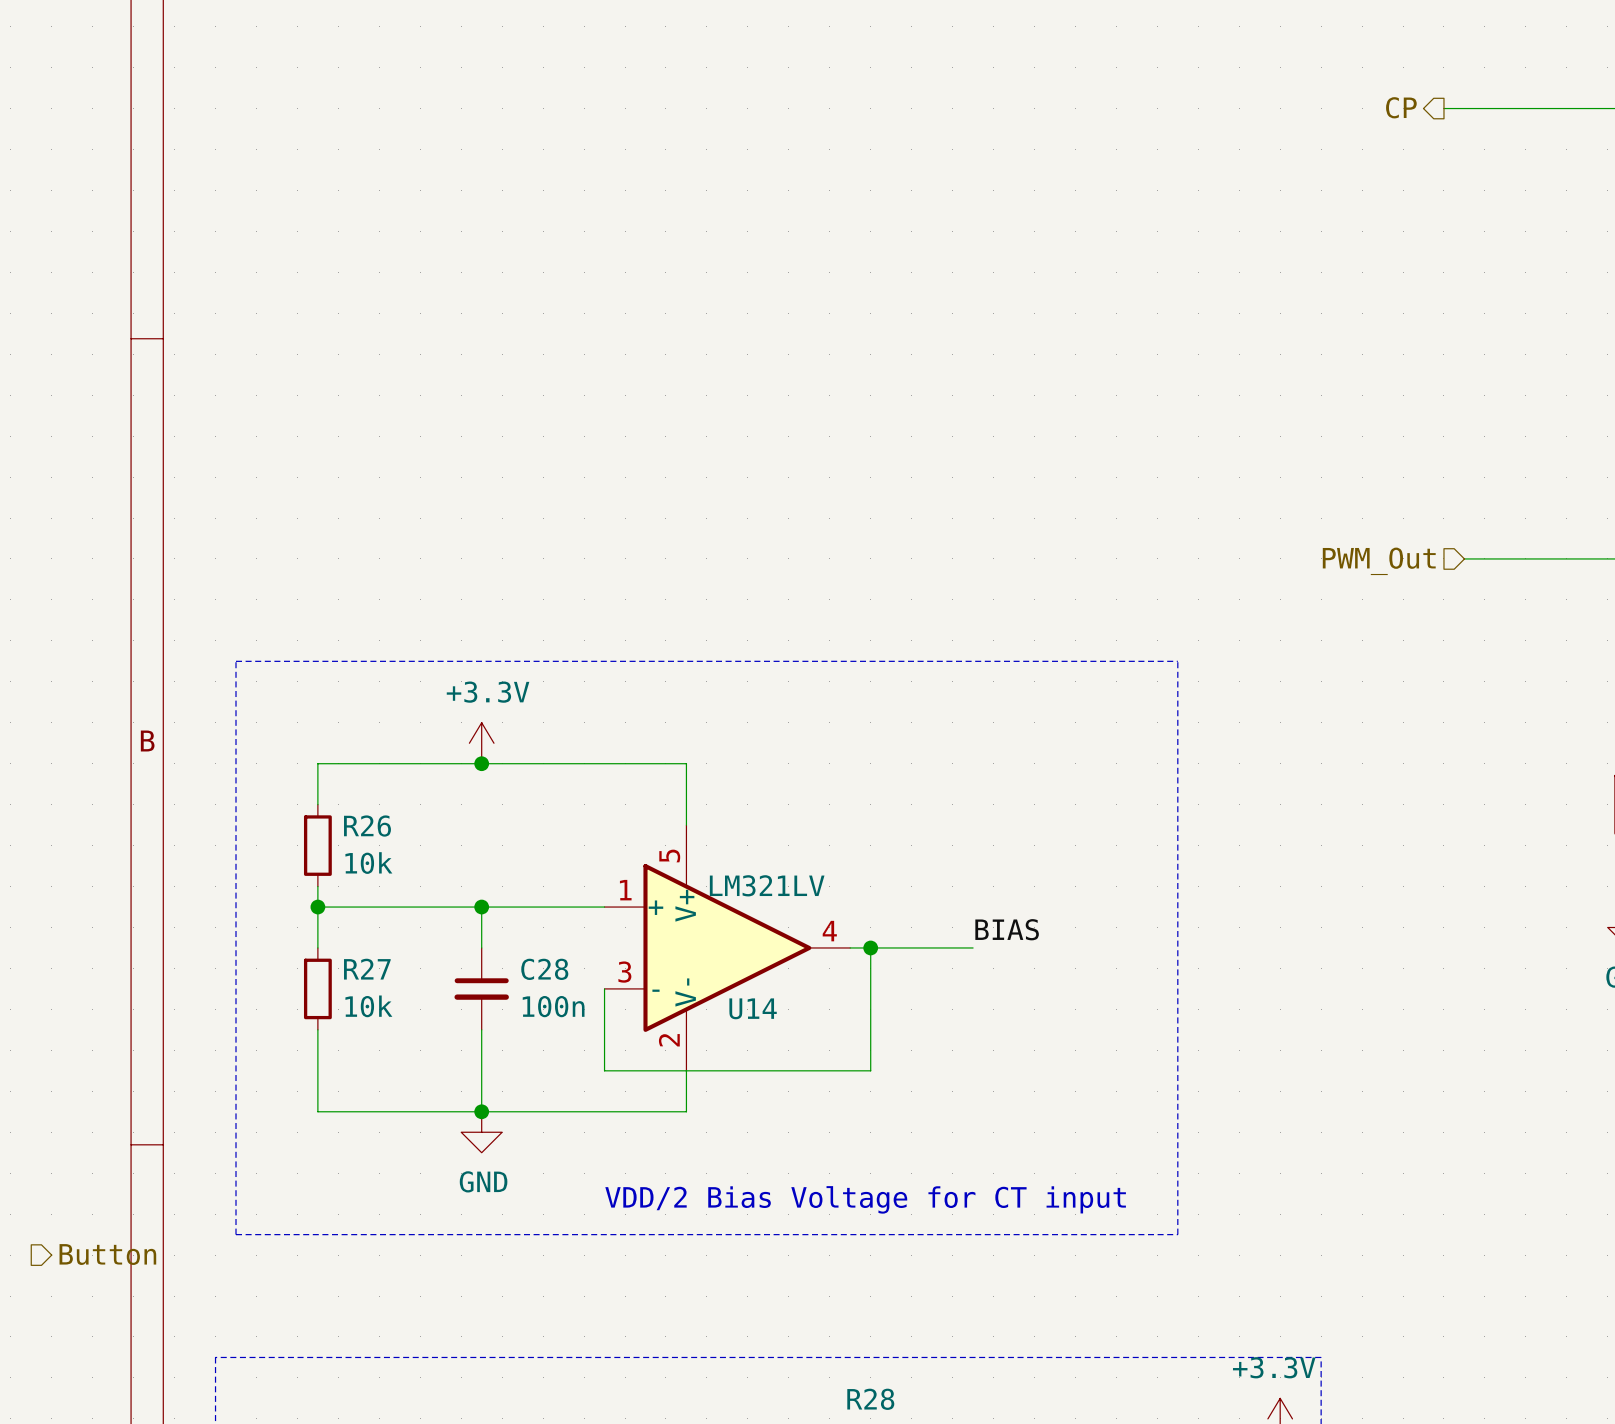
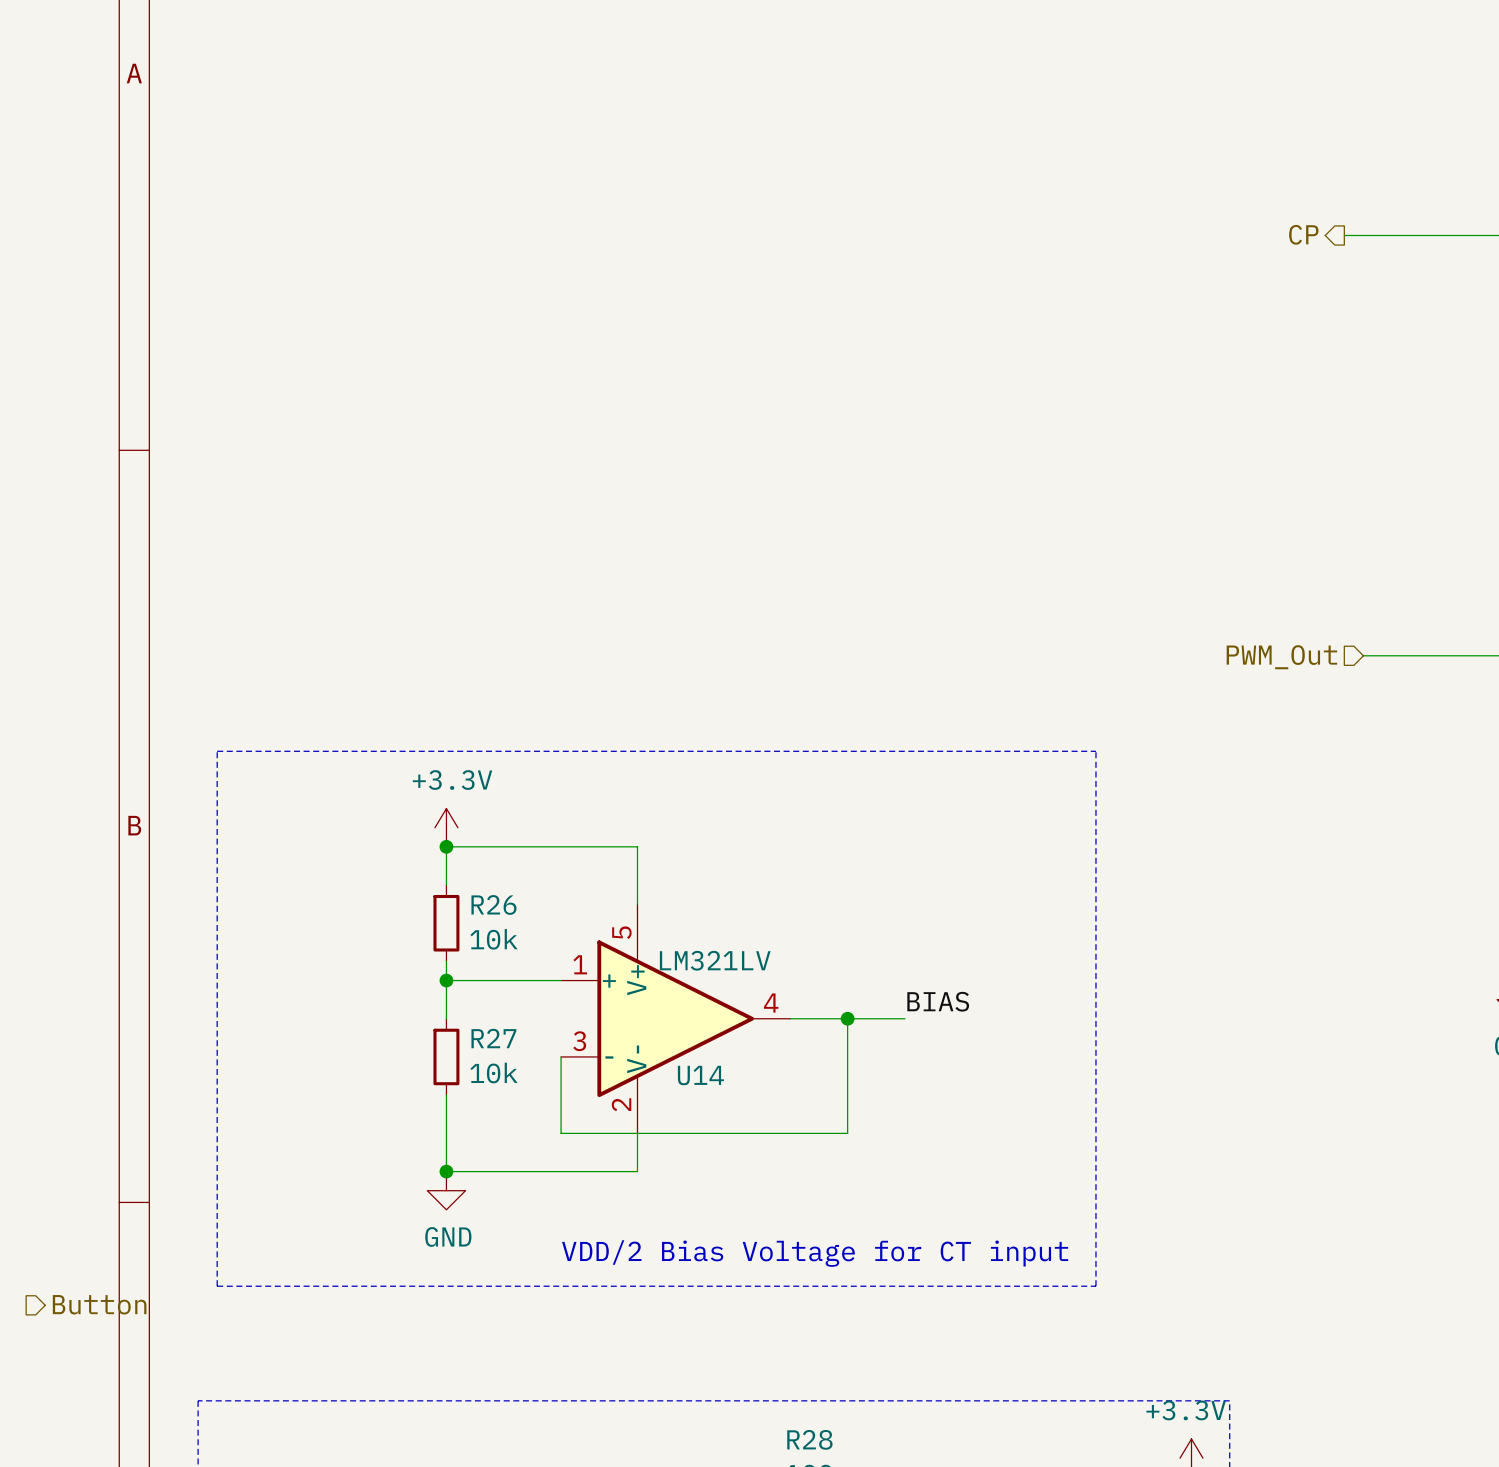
wire: (481, 763) (317, 763) (317, 804) -> (446, 846) (446, 885)
R26 position: (317, 845) -> (446, 923)
wire: (317, 886) (317, 947) -> none
wire: (317, 907) (481, 907) -> (446, 961) (446, 980)
junction: (317, 907) -> none
wire: (870, 947) (870, 1070) -> (847, 1018) (847, 1133) (809, 1133)
junction position: (870, 947) -> (847, 1018)
R27 position: (317, 988) -> (446, 1056)
C28: 100n (481, 988) -> none
wire: (317, 1029) (317, 1111) (481, 1111) -> none

